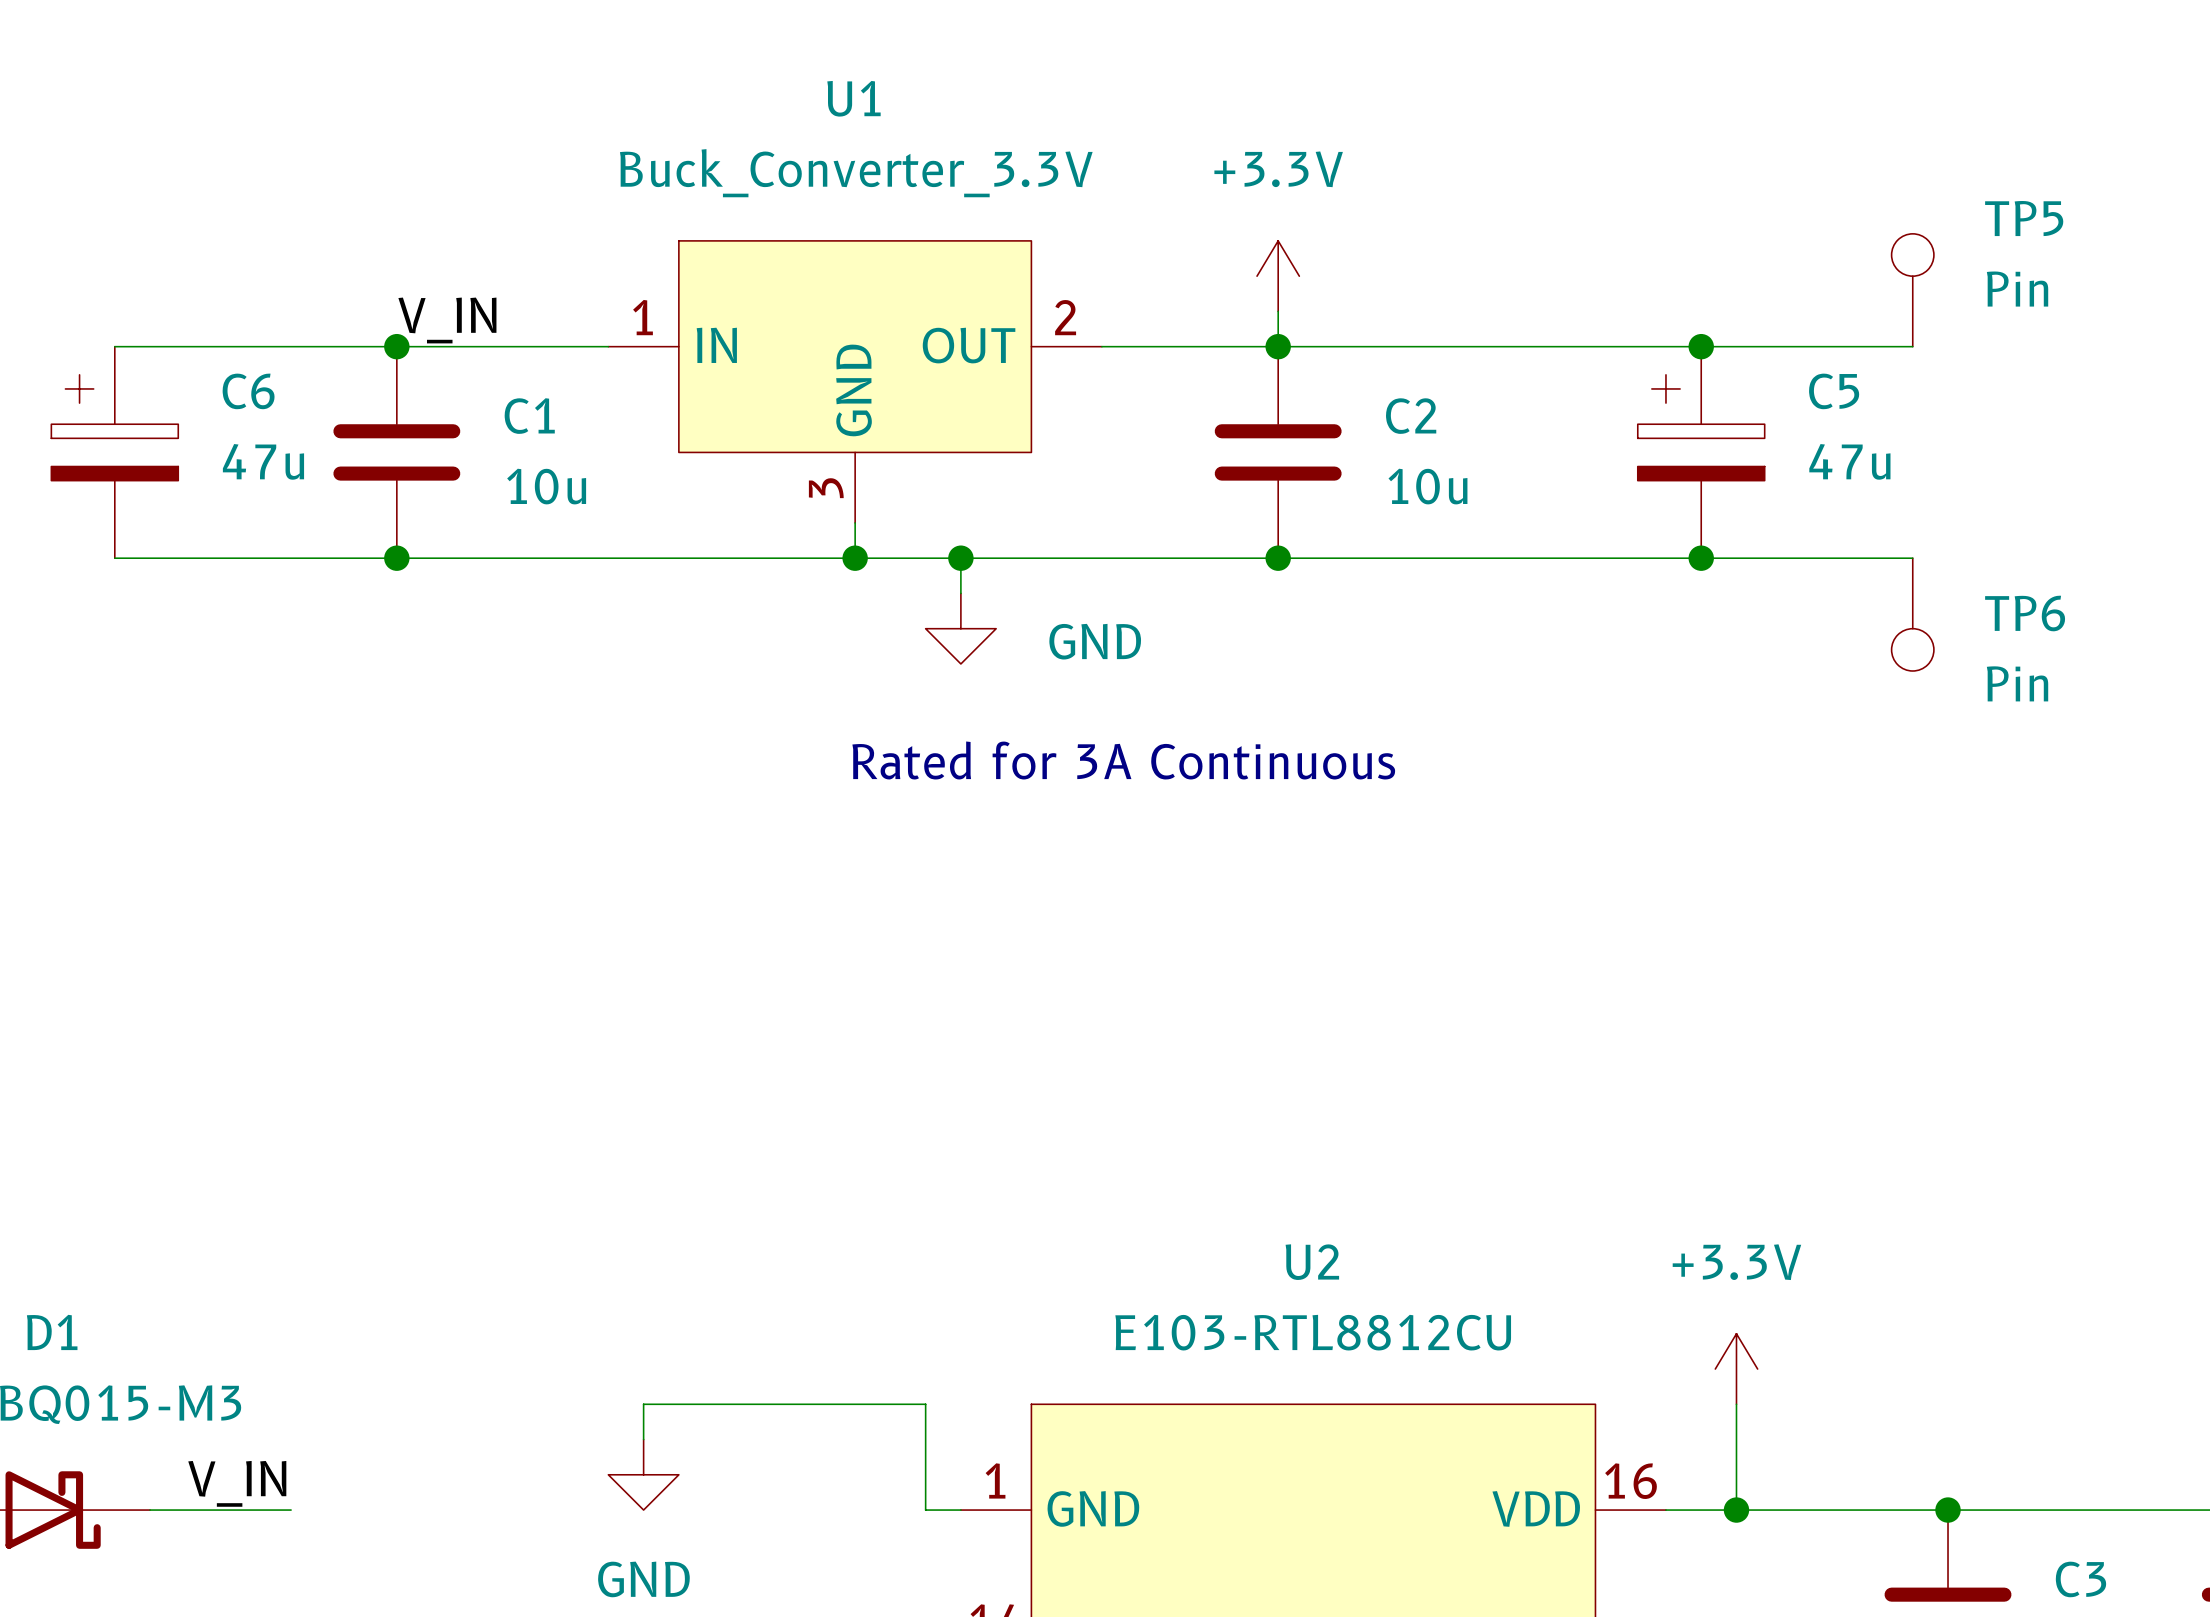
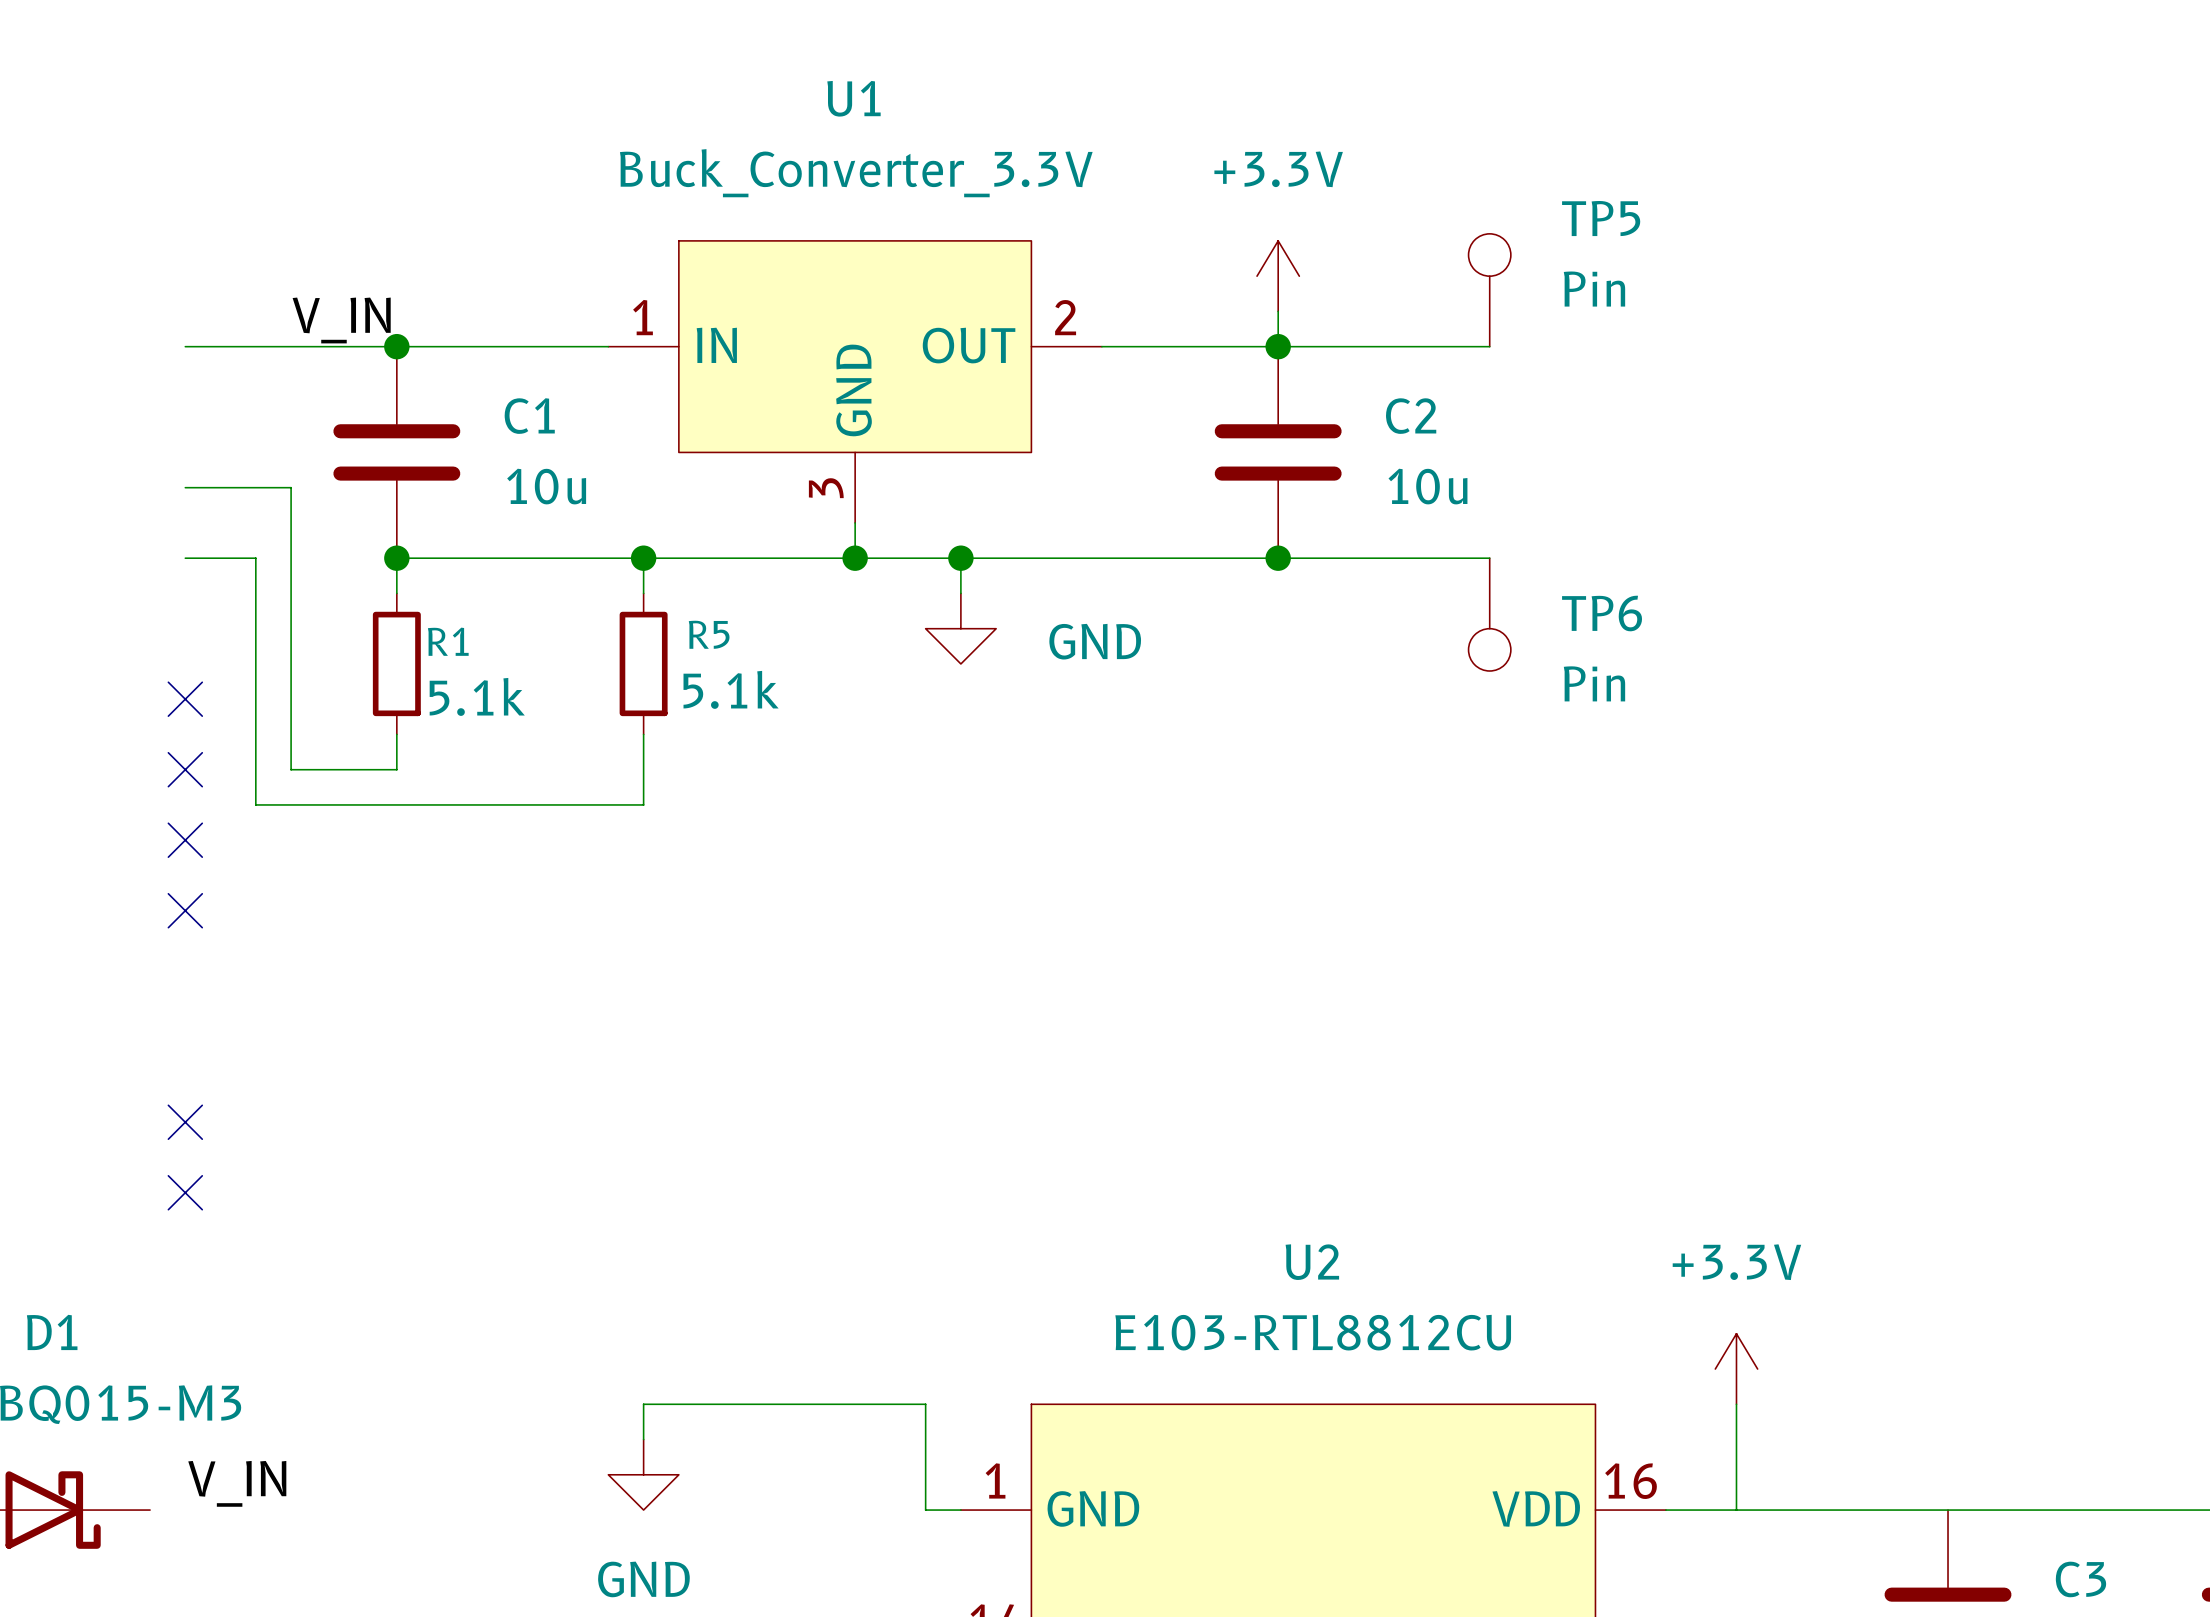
TP5 position: (1912, 290) -> (1489, 290)
label position: V_IN (447, 320) -> V_IN (341, 320)
wire: (114, 346) (185, 346) -> none
wire: (1489, 346) (1912, 346) -> none
junction: (1701, 346) -> none
C6: 47u (114, 452) -> none
C5: 47u (1701, 452) -> none
wire: none -> (185, 487) (291, 487) (291, 769) (396, 769) (396, 734)
wire: (114, 558) (185, 558) -> none
wire: (255, 558) (396, 558) -> (396, 593) (396, 558)
wire: none -> (255, 558) (255, 804) (643, 804) (643, 734)
wire: none -> (643, 558) (643, 593)
junction: none -> (643, 558)
wire: (1489, 558) (1912, 558) -> none
junction: (1701, 558) -> none
TP6 position: (1912, 614) -> (1489, 614)
R1: none -> 5.1k (396, 663)
R5: none -> 5.1k (643, 663)
no-connect mark: none -> (185, 699)
text: Rated for 3A Continuous (1123, 760) -> none
no-connect mark: none -> (185, 769)
no-connect mark: none -> (185, 840)
no-connect mark: none -> (185, 910)
no-connect mark: none -> (185, 1122)
no-connect mark: none -> (185, 1192)
wire: (150, 1510) (291, 1510) -> none
junction: (1736, 1510) -> none
junction: (1948, 1510) -> none

